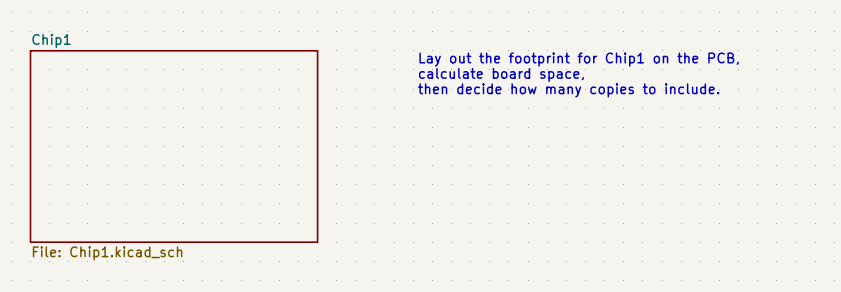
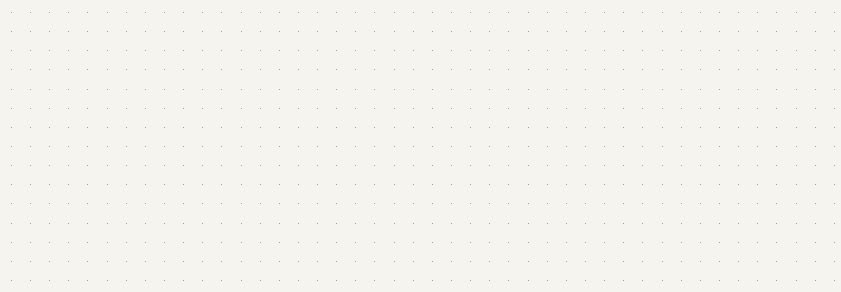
text: Lay out the footprint for Chip1 on the PCB, (579, 59) -> none
text: calculate board space, (501, 74) -> none
text: then decide how many copies to include. (568, 90) -> none
sheet Chip1: File: Chip1.kicad_sch (174, 146) -> none

